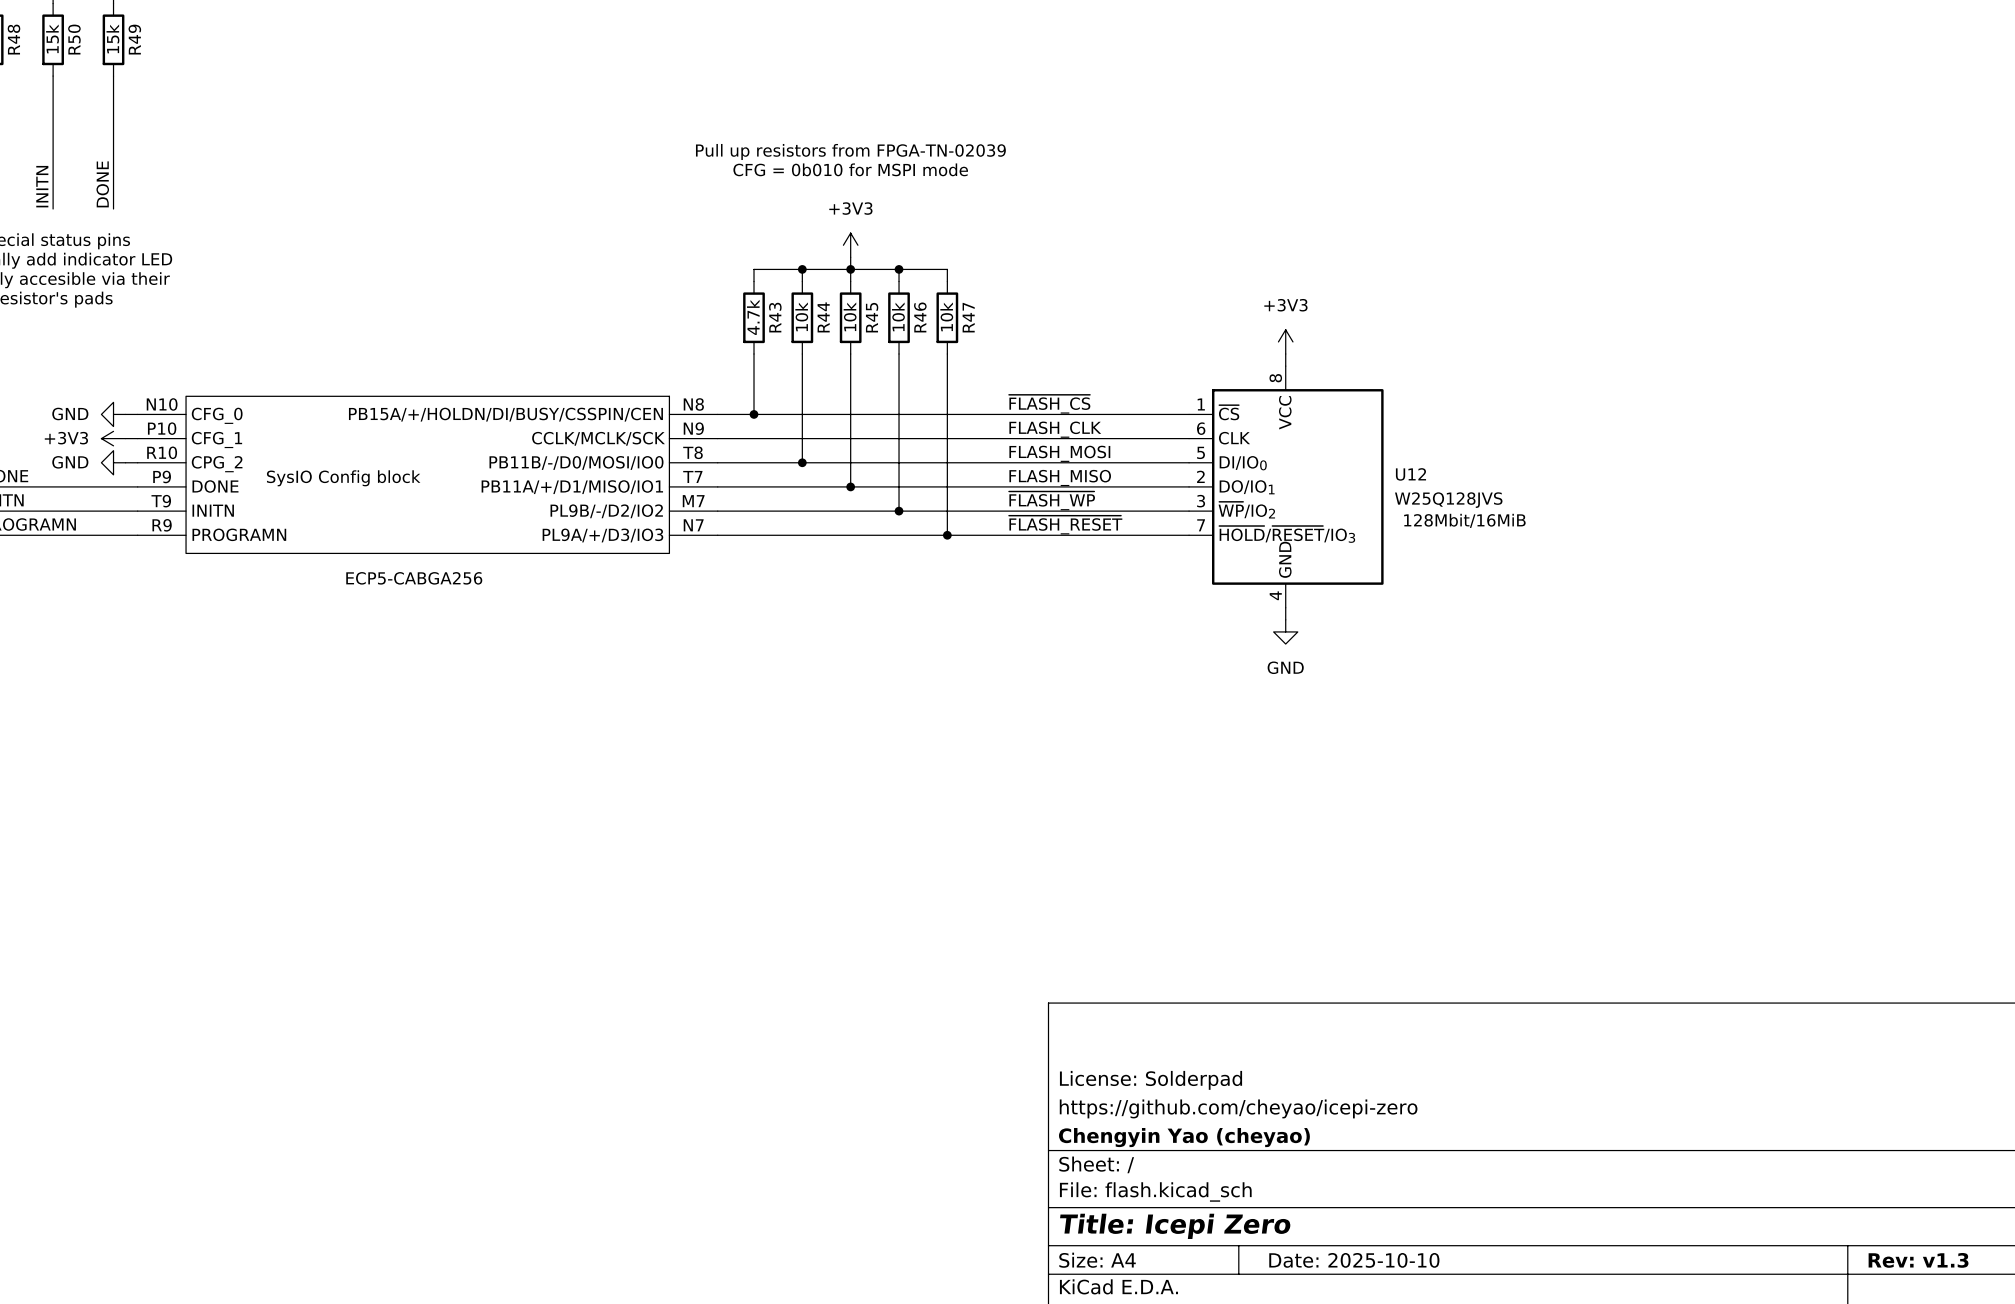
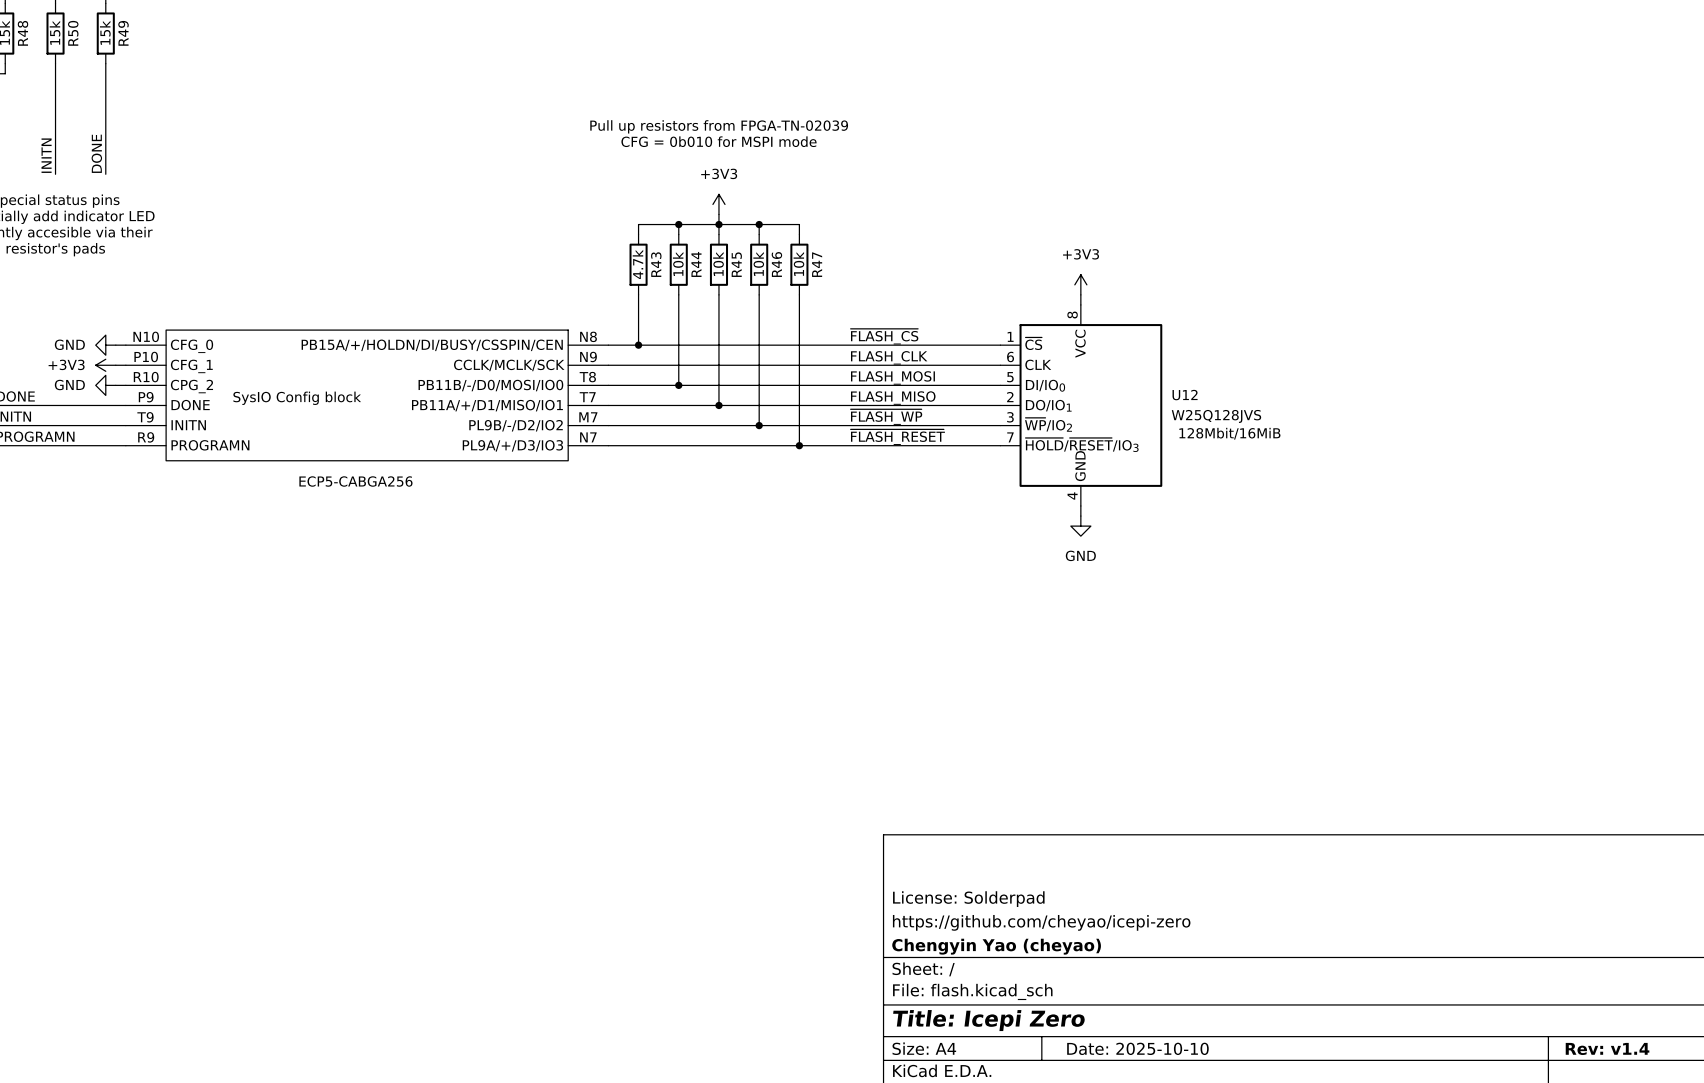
title block: Rev: v1.3 (1918, 1260) -> Rev: v1.4 (1607, 1048)

